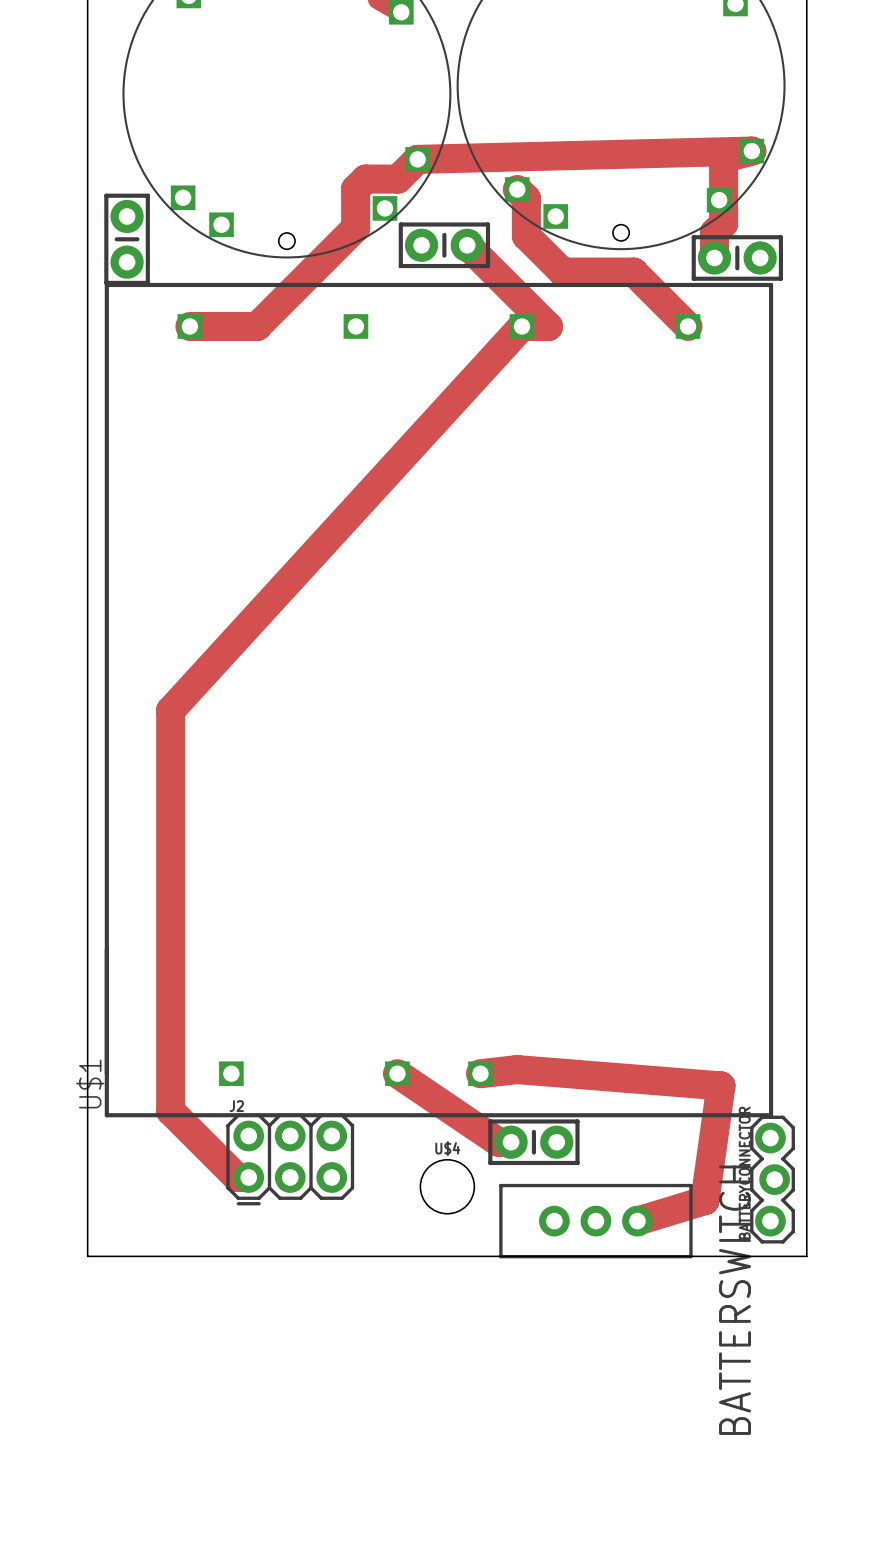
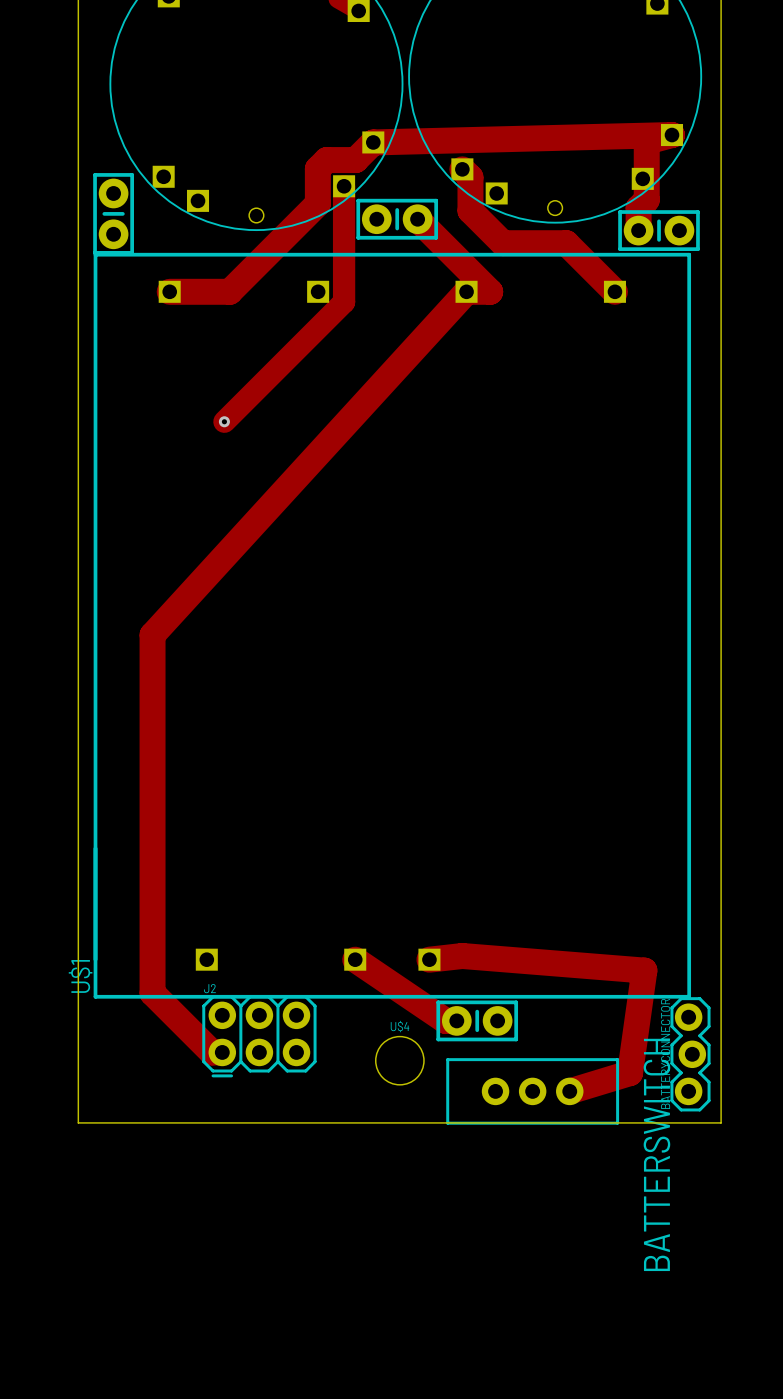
track: none -> (344, 186) (344, 302) (224, 421)
via: none -> (224, 421)

